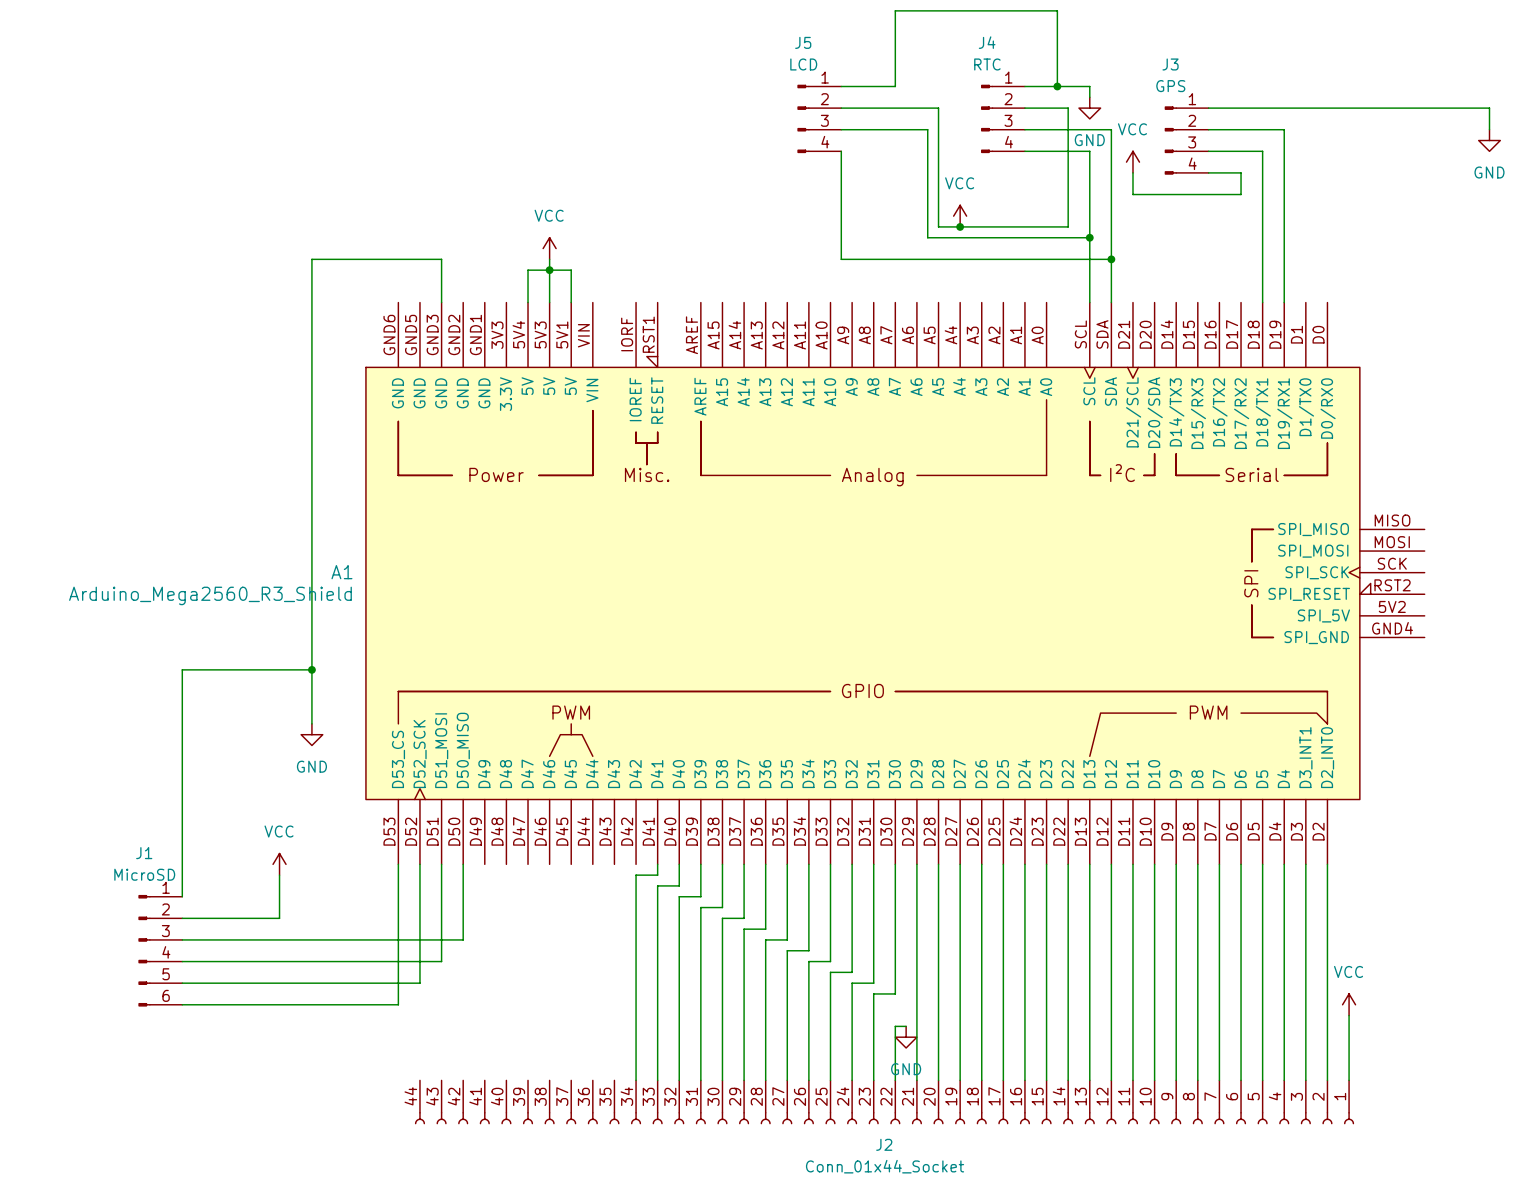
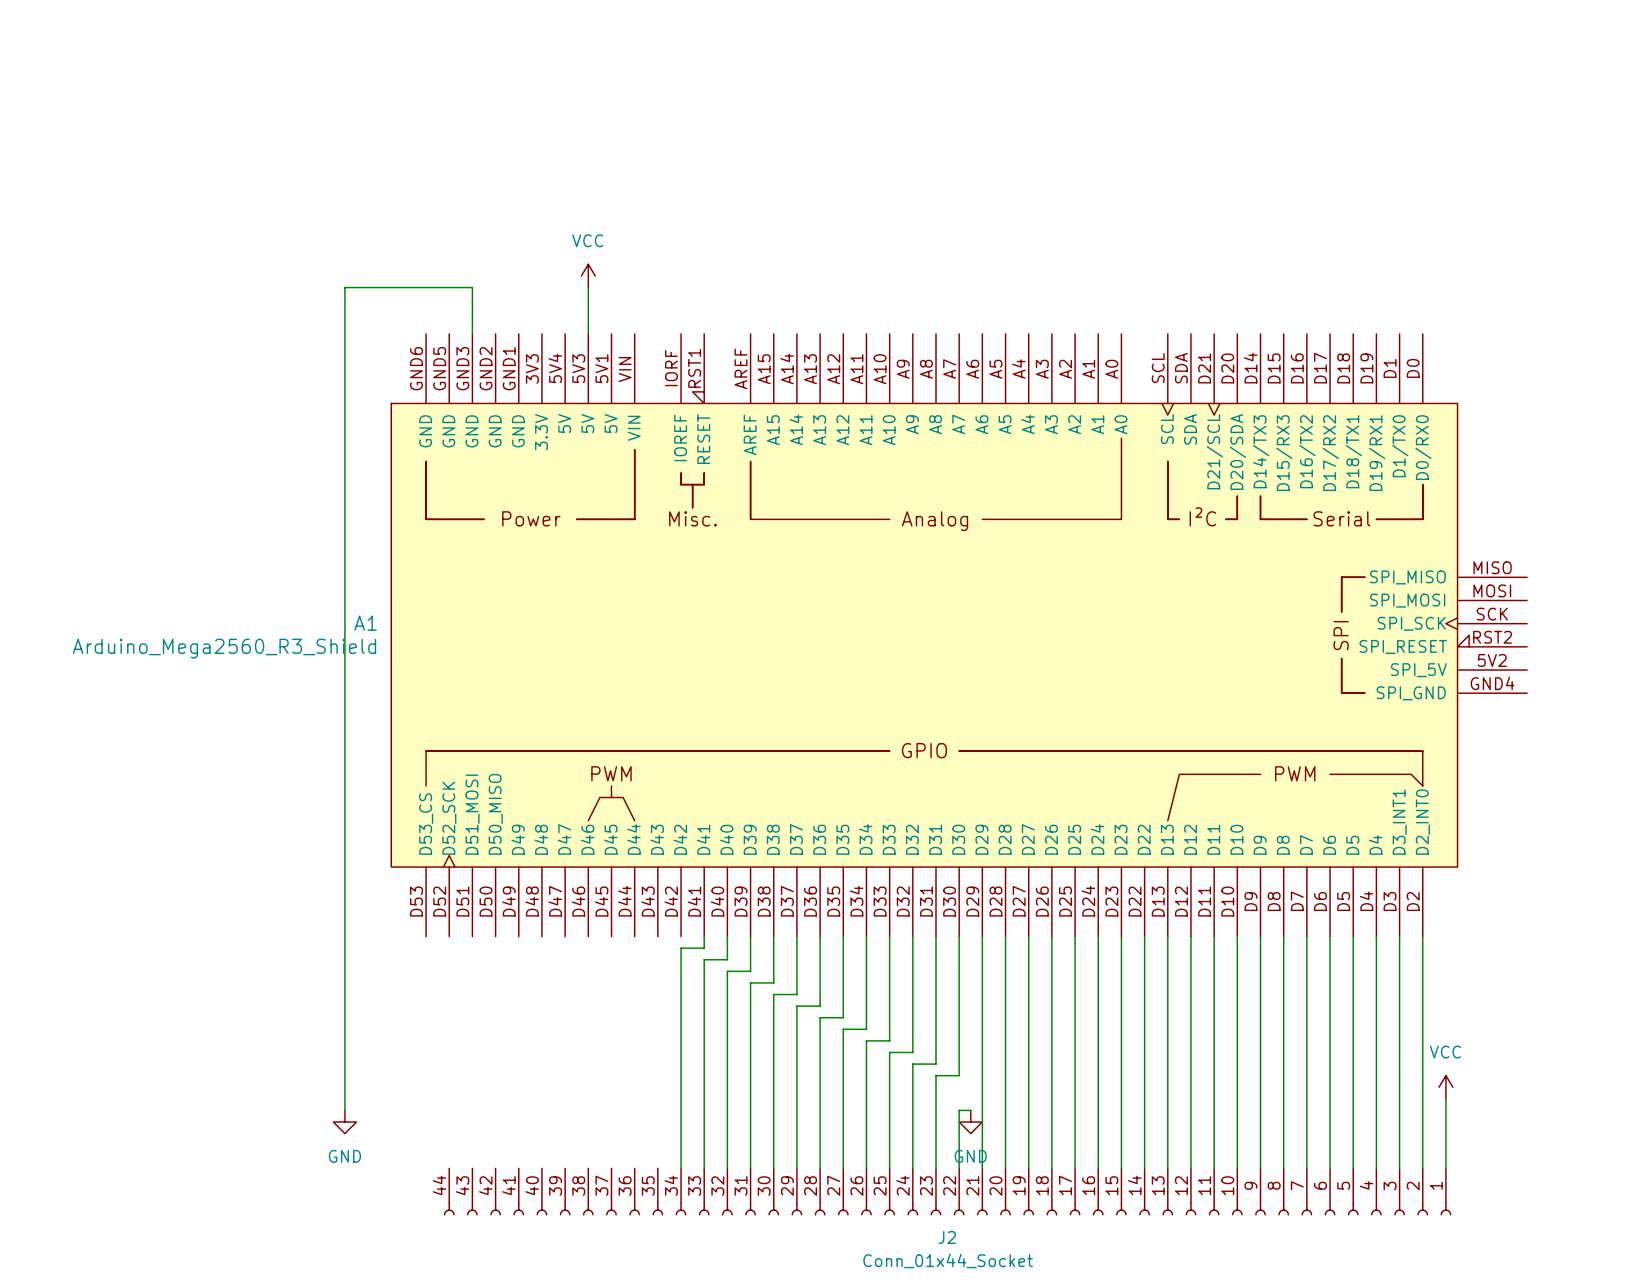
wire: (841, 86) (895, 86) (895, 10) (1057, 10) (1057, 86) -> none
wire: (1024, 86) (1089, 86) (1089, 97) -> none
junction: (1057, 86) -> none
wire: (841, 108) (938, 108) (938, 226) (1068, 226) (1068, 108) (1024, 108) -> none
power symbol: GND (1089, 108) -> none
wire: (1208, 108) (1489, 108) (1489, 129) -> none
J5: LCD (819, 118) -> none
J4: RTC (1003, 118) -> none
wire: (841, 129) (927, 129) (927, 237) (1089, 237) -> none
wire: (1024, 129) (1111, 129) (1111, 302) -> none
wire: (1208, 129) (1284, 129) (1284, 302) -> none
J3: GPS (1186, 140) -> none
power symbol: GND (1489, 140) -> none
wire: (841, 151) (841, 259) (1111, 259) -> none
wire: (1024, 151) (1089, 151) (1089, 302) -> none
wire: (1208, 151) (1262, 151) (1262, 302) -> none
power symbol: VCC (1132, 162) -> none
wire: (1132, 172) (1132, 194) (1241, 194) (1241, 172) (1208, 172) -> none
power symbol: VCC (960, 216) -> none
junction: (960, 226) -> none
junction: (1089, 237) -> none
wire: (322, 259) (311, 259) (311, 723) -> (344, 287) (344, 1110)
junction: (1111, 259) -> none
junction: (549, 270) -> none
wire: (528, 302) (528, 270) (571, 270) (571, 302) -> none
wire: (311, 669) (182, 669) (182, 896) -> none
junction: (311, 669) -> none
power symbol: GND (311, 734) -> none
power symbol: VCC (279, 864) -> none
wire: (398, 864) (398, 1004) (182, 1004) -> none
wire: (419, 864) (419, 983) (182, 983) -> none
wire: (441, 864) (441, 961) (182, 961) -> none
wire: (463, 864) (463, 939) (182, 939) -> none
wire: (279, 875) (279, 918) (182, 918) -> none
J1: MicroSD (160, 950) -> none
power symbol: none -> GND (344, 1122)

